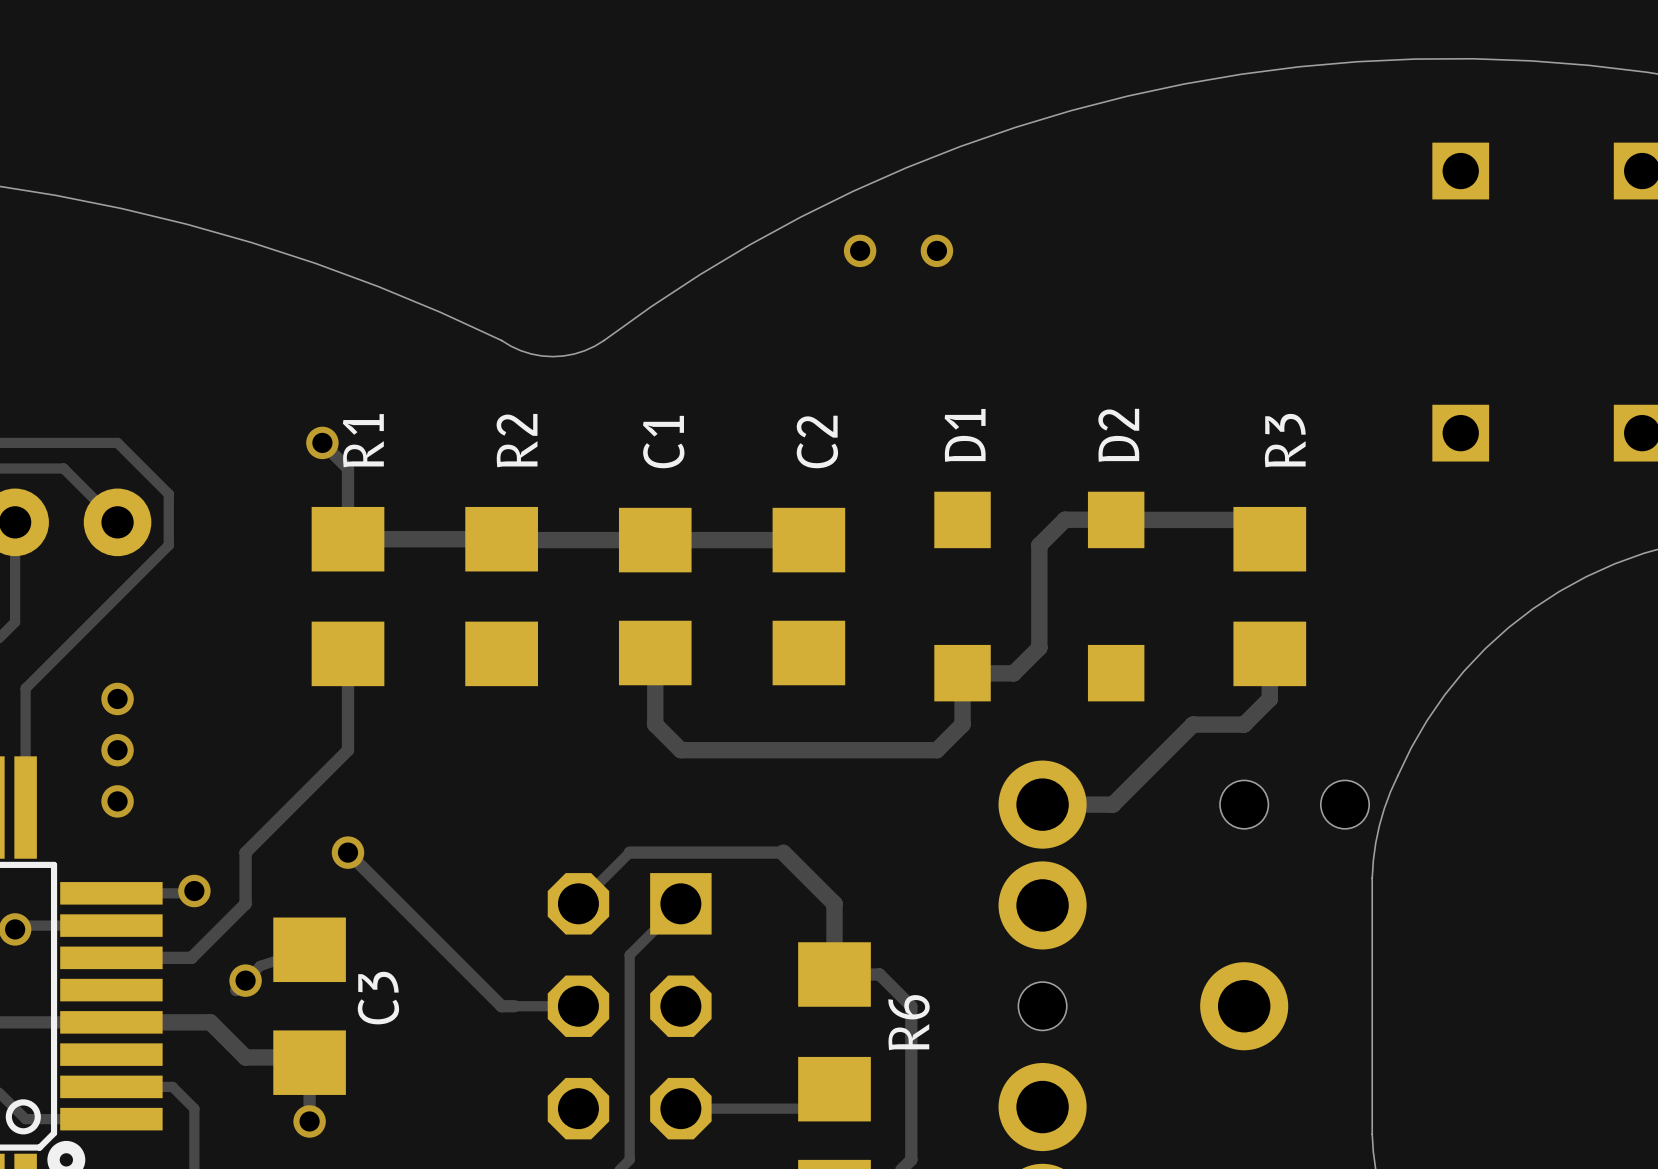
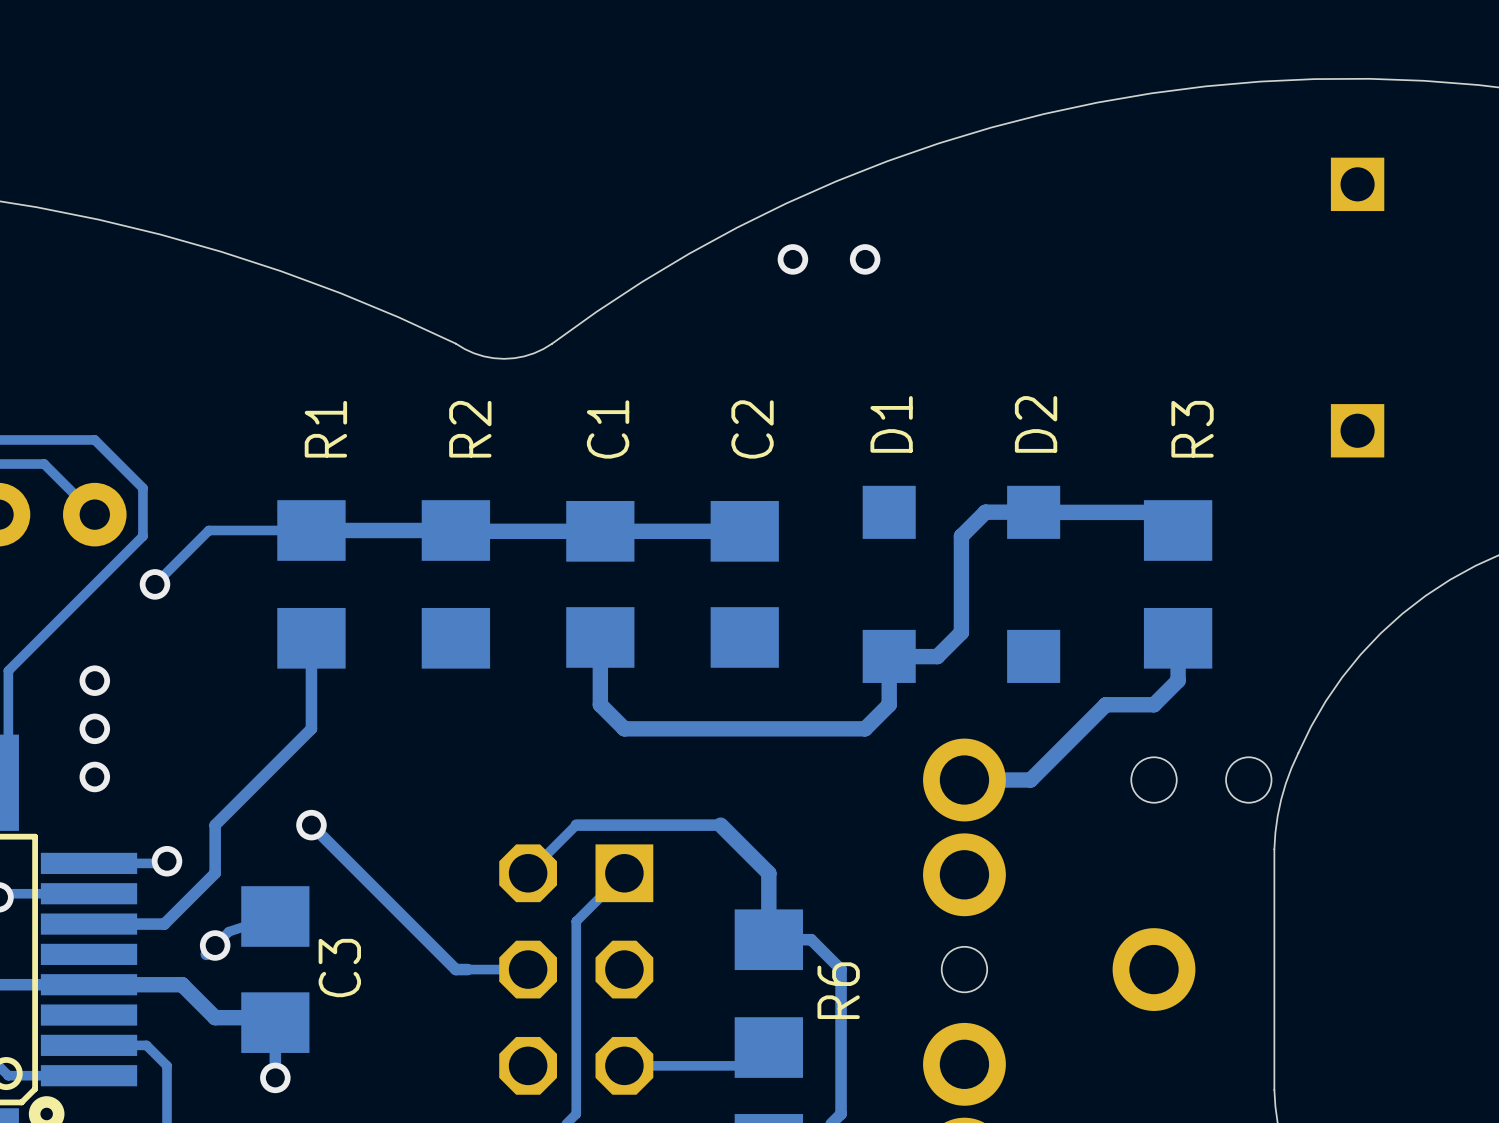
track: (322, 442) (348, 468) (348, 539) -> (154, 584) (208, 530) (311, 530)
via position: (322, 442) -> (154, 584)

